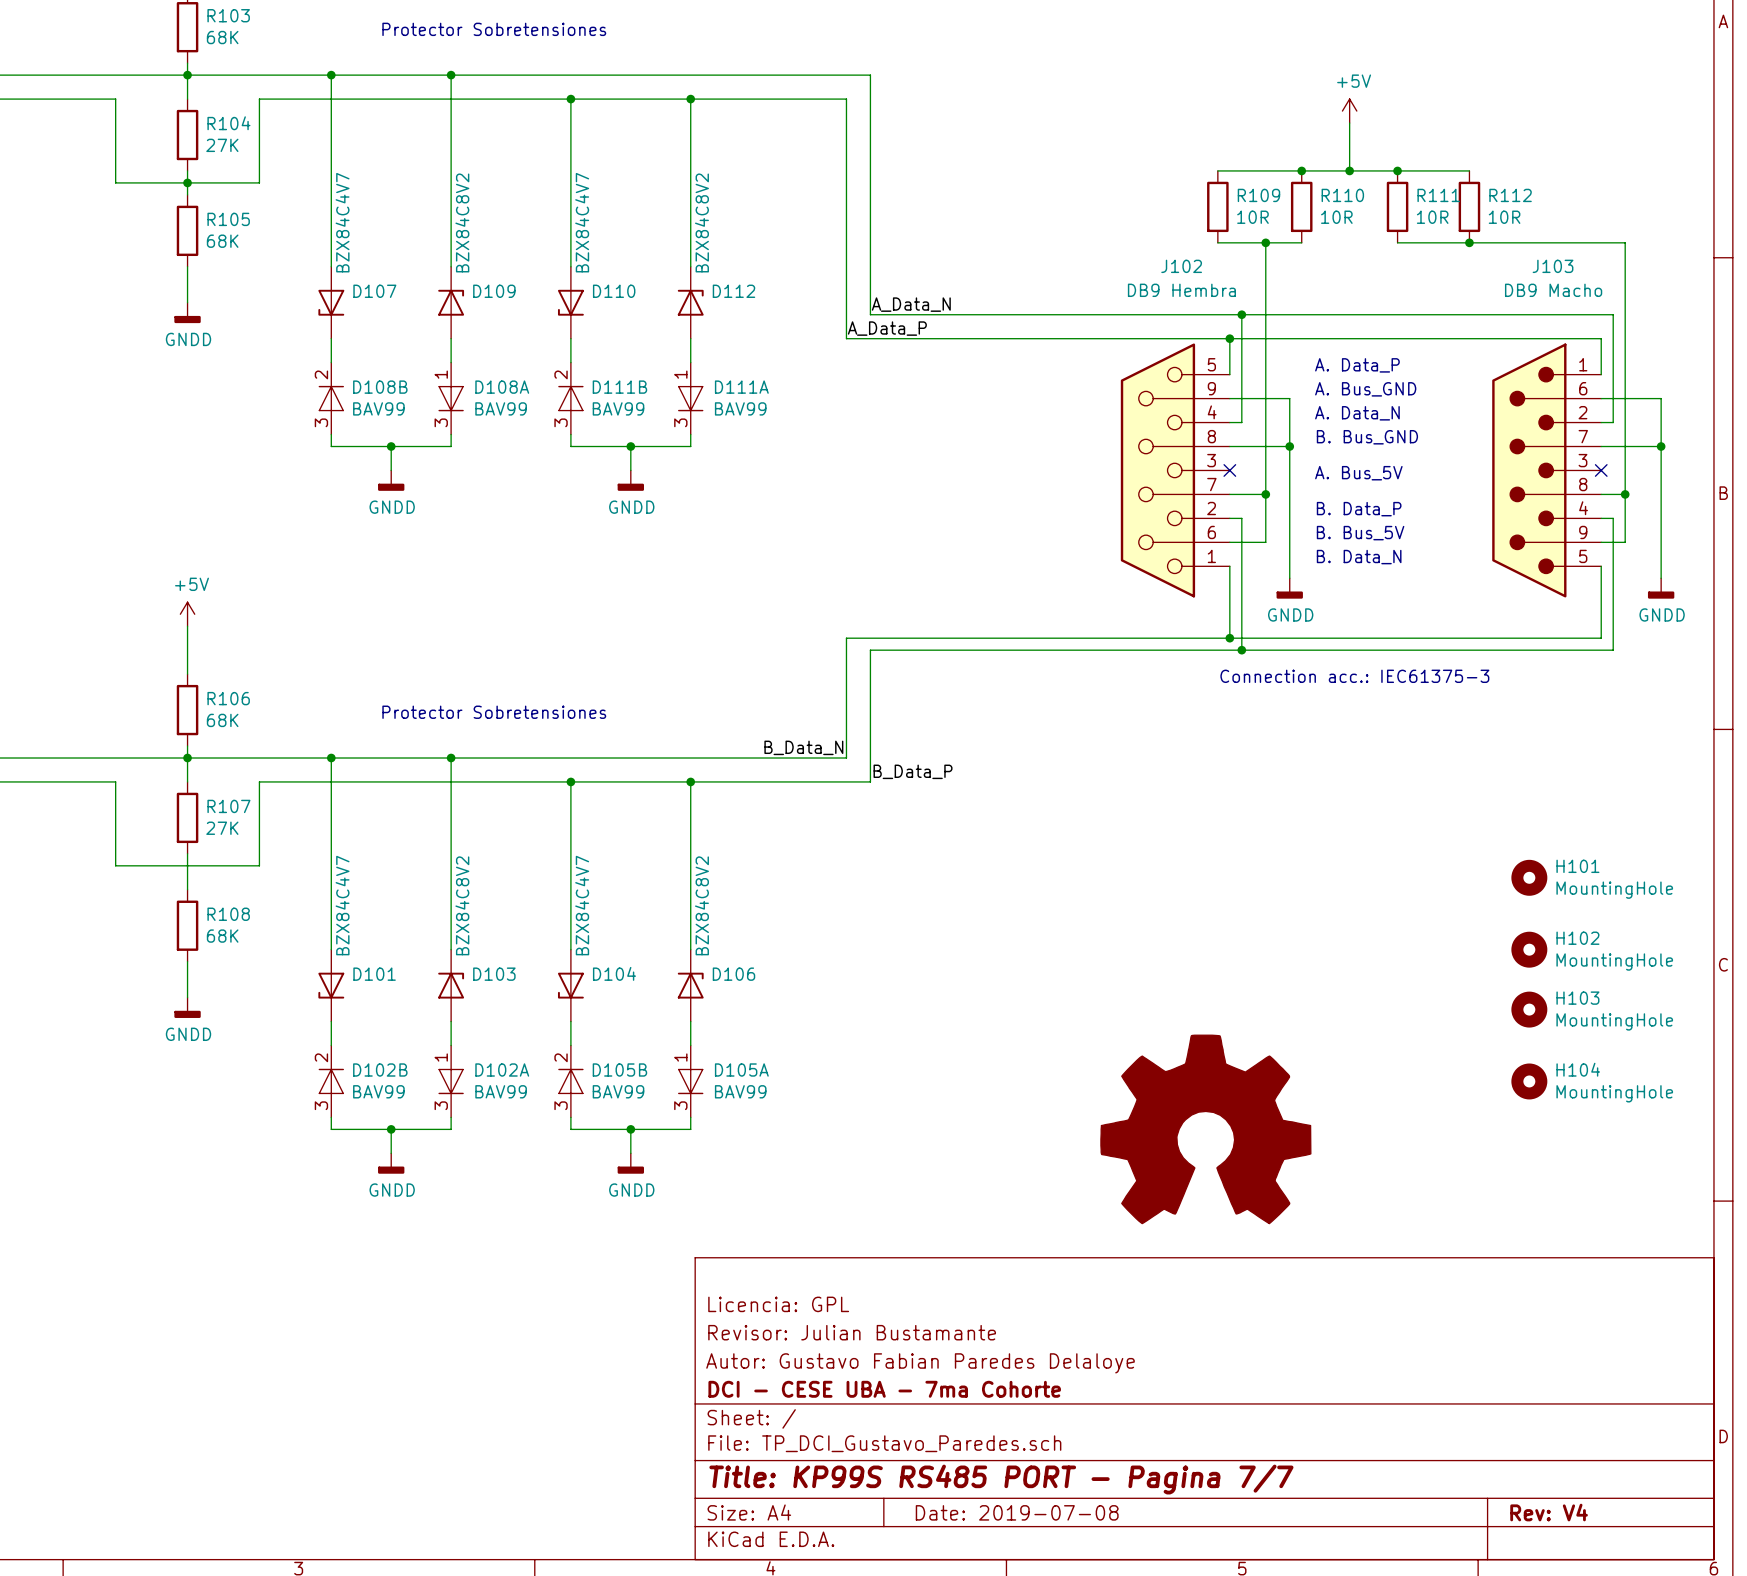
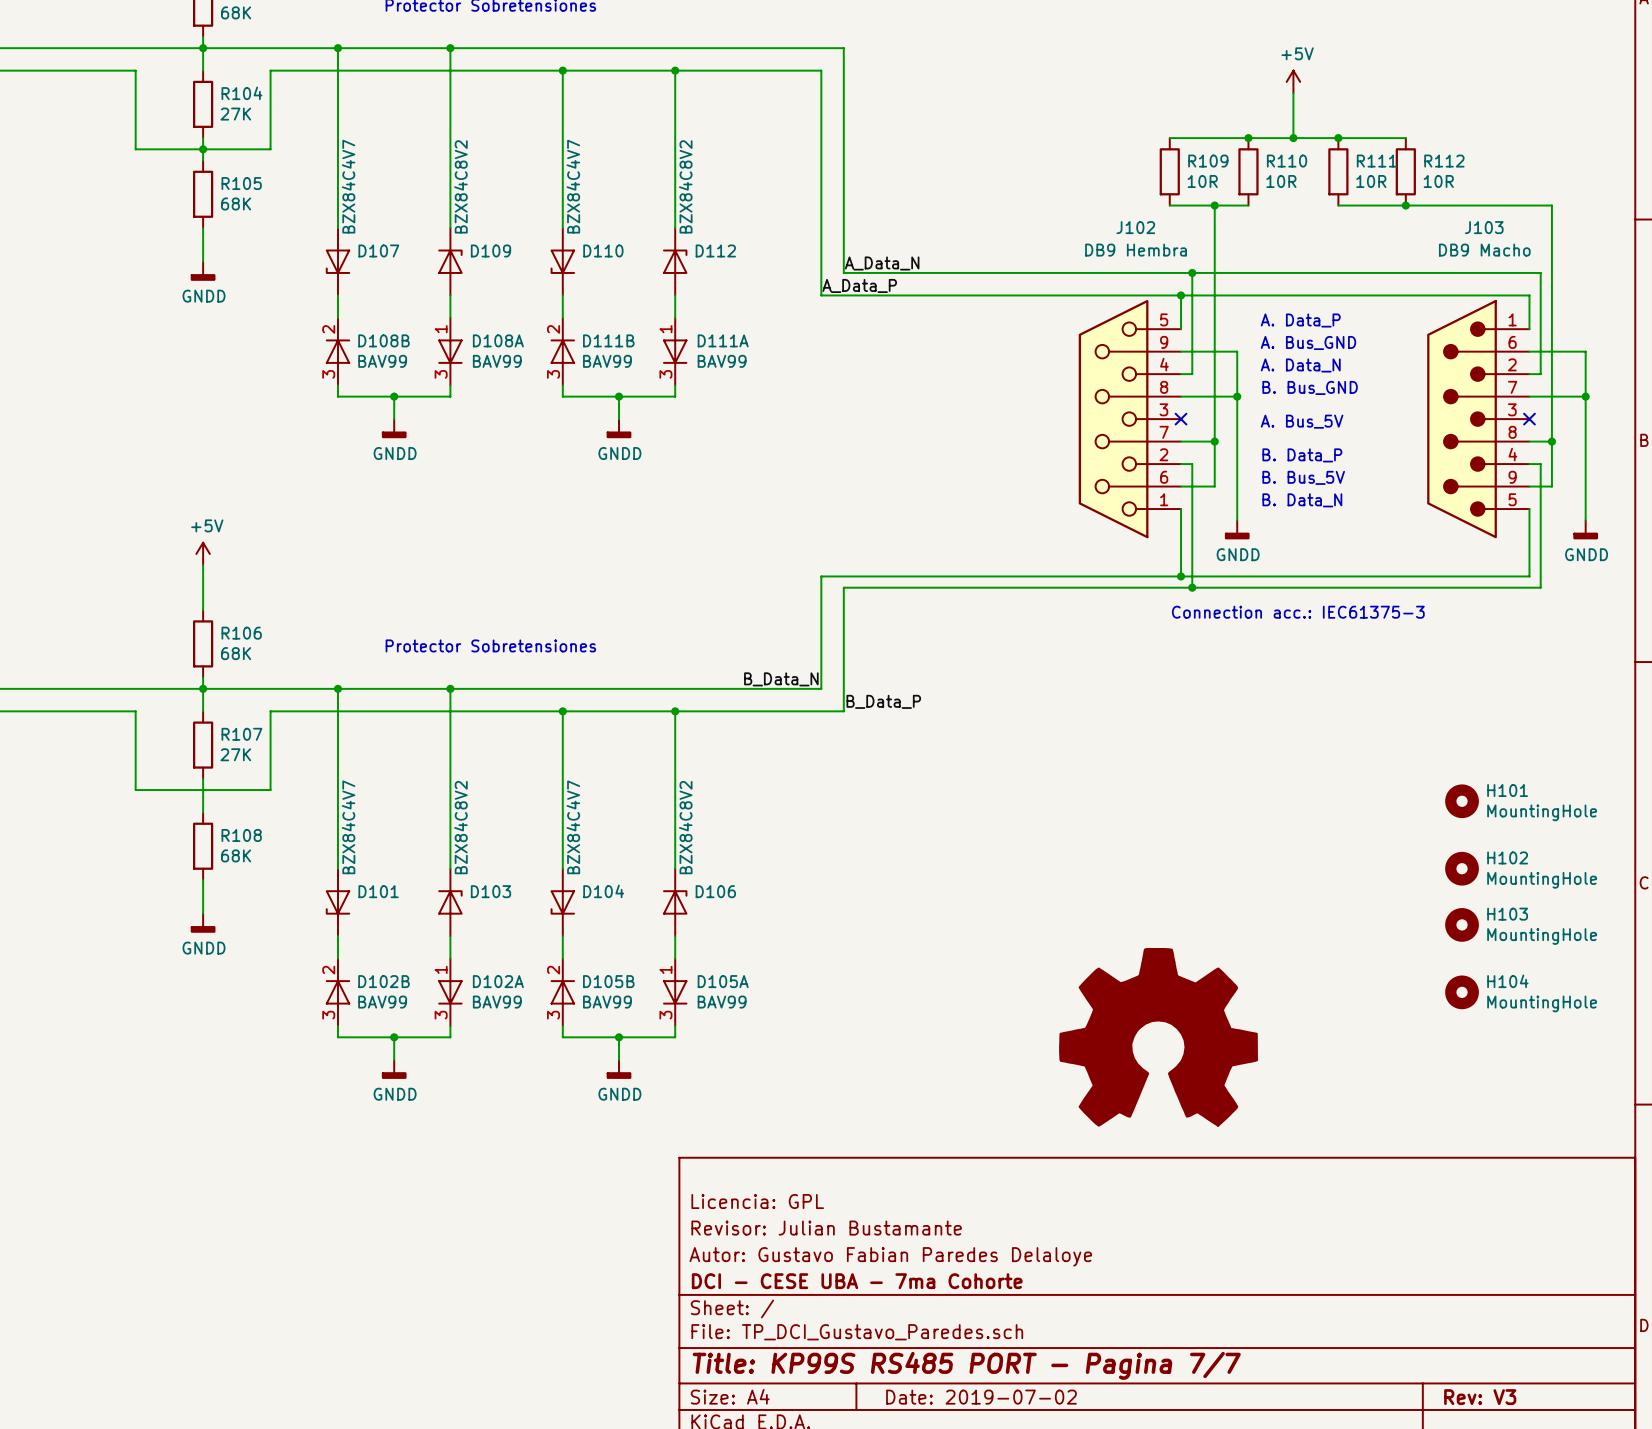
title block: Date: 2019-07-08 (1017, 1512) -> Date: 2019-07-02 (981, 1397)
title block: Rev: V4 (1549, 1512) -> Rev: V3 (1480, 1397)

